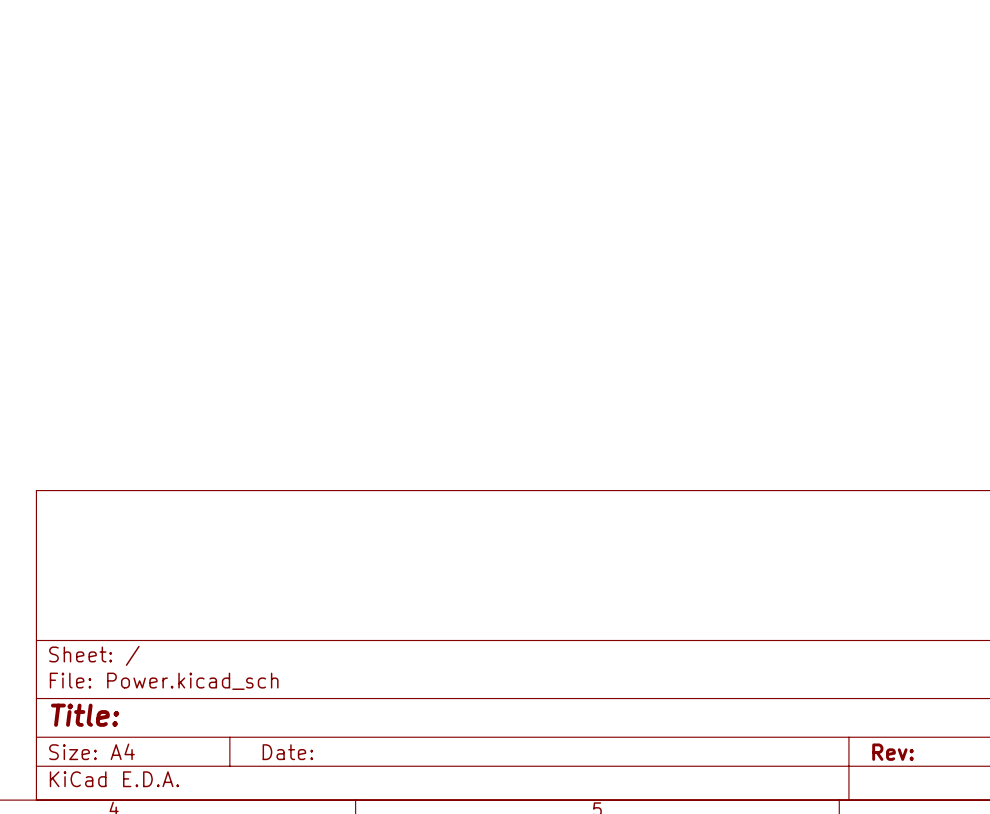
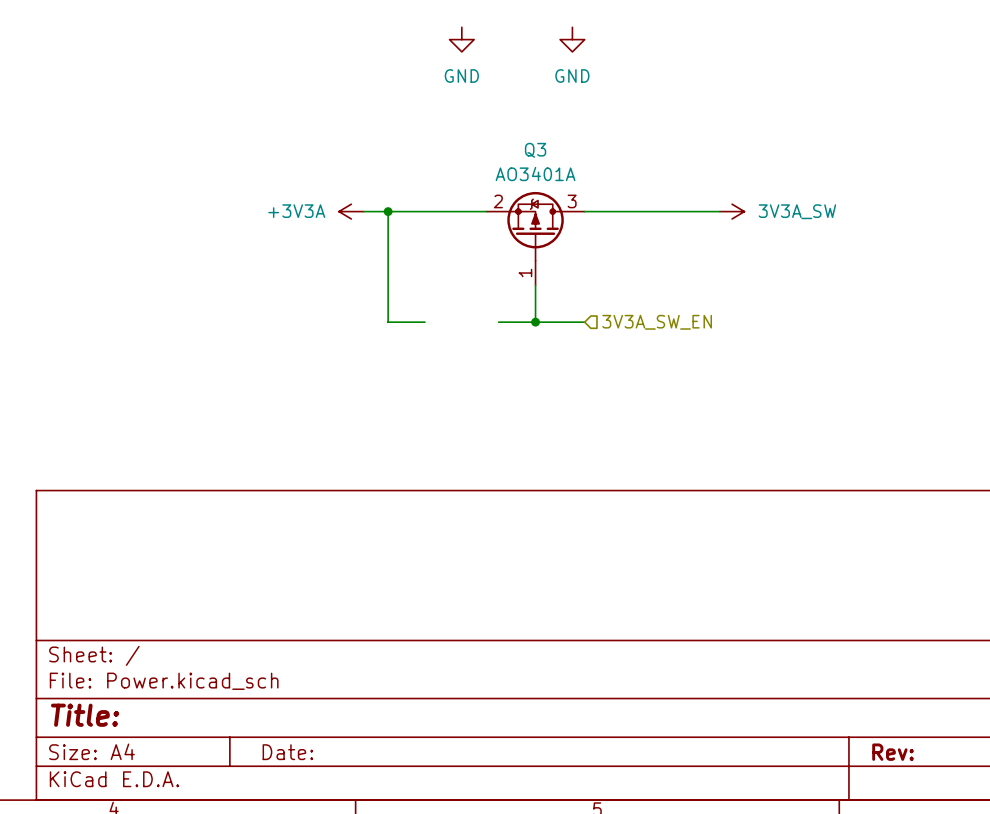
power symbol: none -> GND (461, 39)
power symbol: none -> GND (572, 39)
power symbol: none -> +3V3A (351, 211)
wire: none -> (363, 211) (486, 211)
wire: none -> (388, 211) (388, 322) (424, 322)
junction: none -> (388, 211)
wire: none -> (584, 211) (719, 211)
power symbol: none -> 3V3A_SW (732, 211)
Q3: none -> AO3401A (535, 238)
wire: none -> (535, 285) (535, 322)
wire: none -> (498, 322) (584, 322)
junction: none -> (535, 322)
hierarchical label: none -> 3V3A_SW_EN (657, 322)

